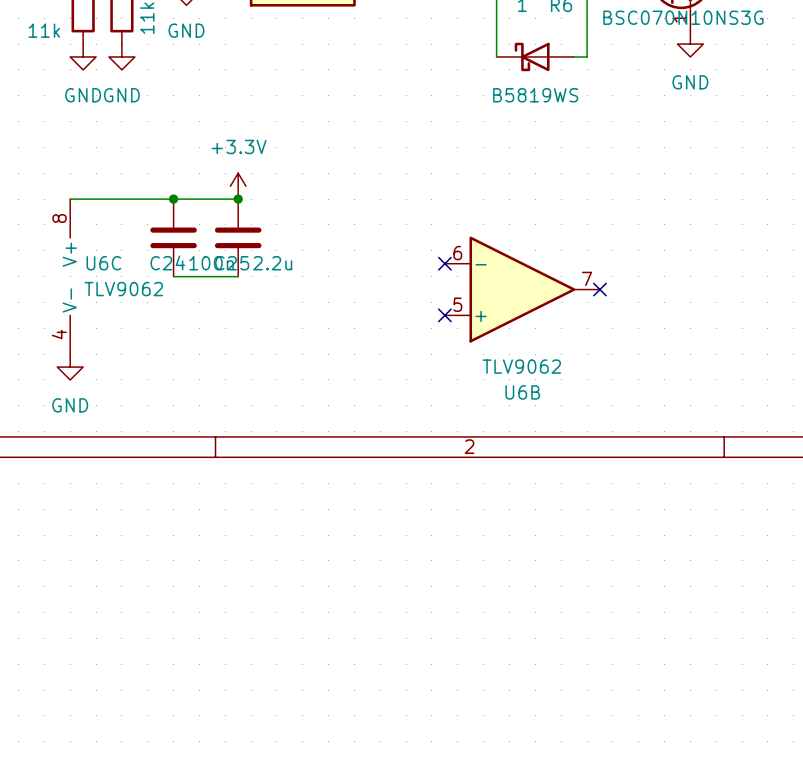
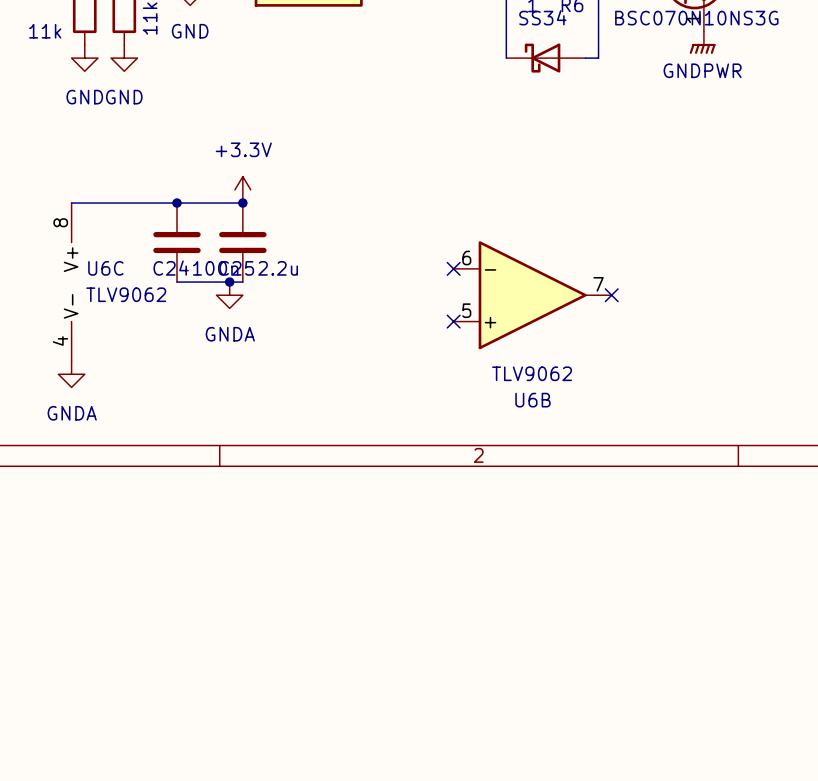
power symbol: GND (690, 44) -> GNDPWR (702, 42)
part value: B5819WS (535, 95) -> SS34 (542, 17)
junction: none -> (229, 282)
power symbol: none -> GNDA (229, 295)
power symbol: GND (70, 367) -> GNDA (71, 374)

